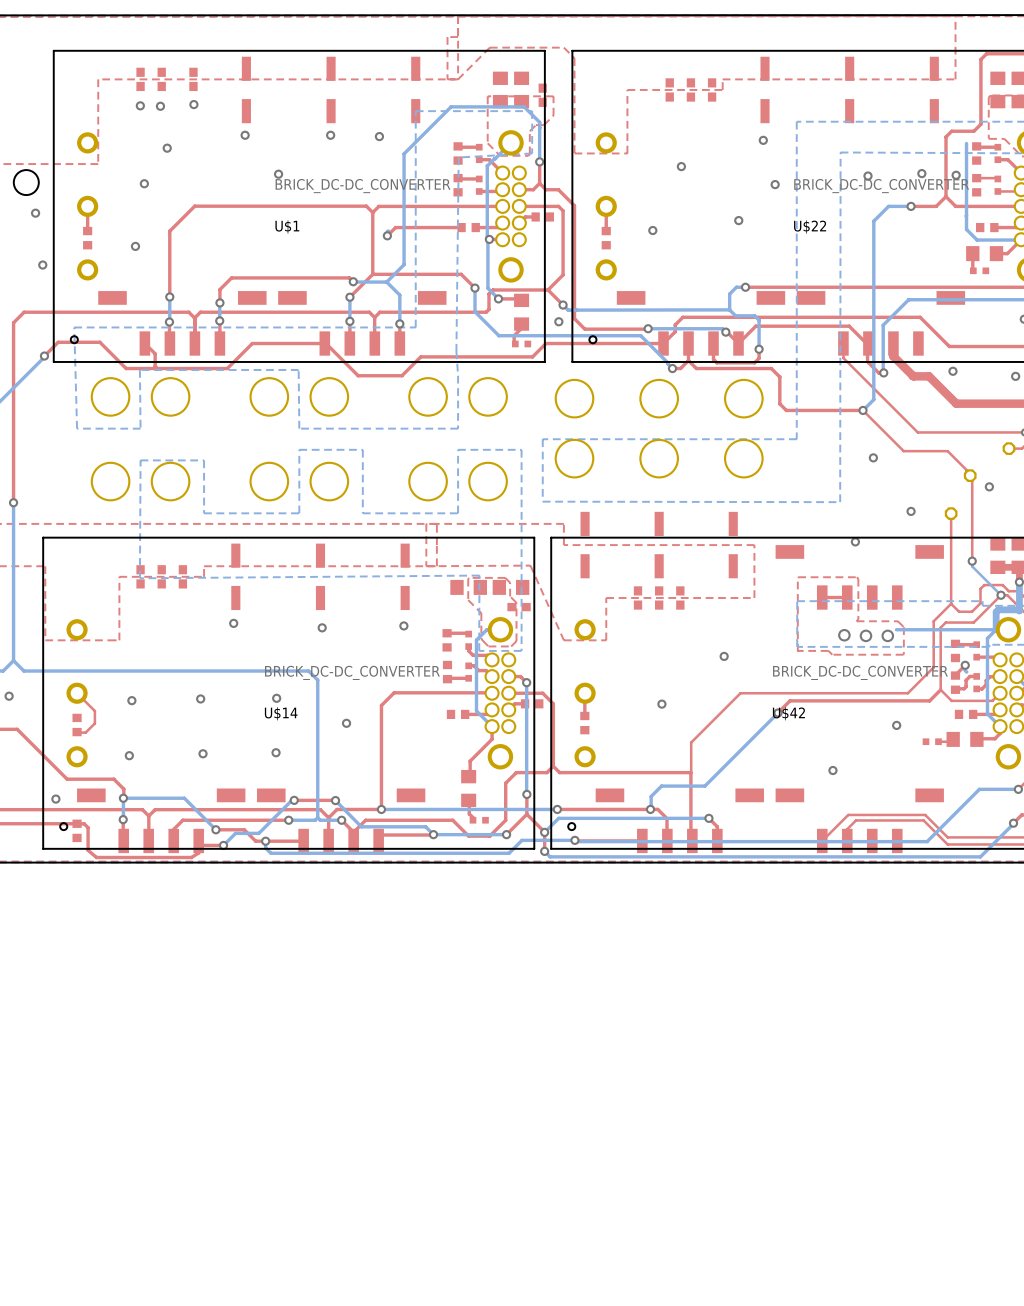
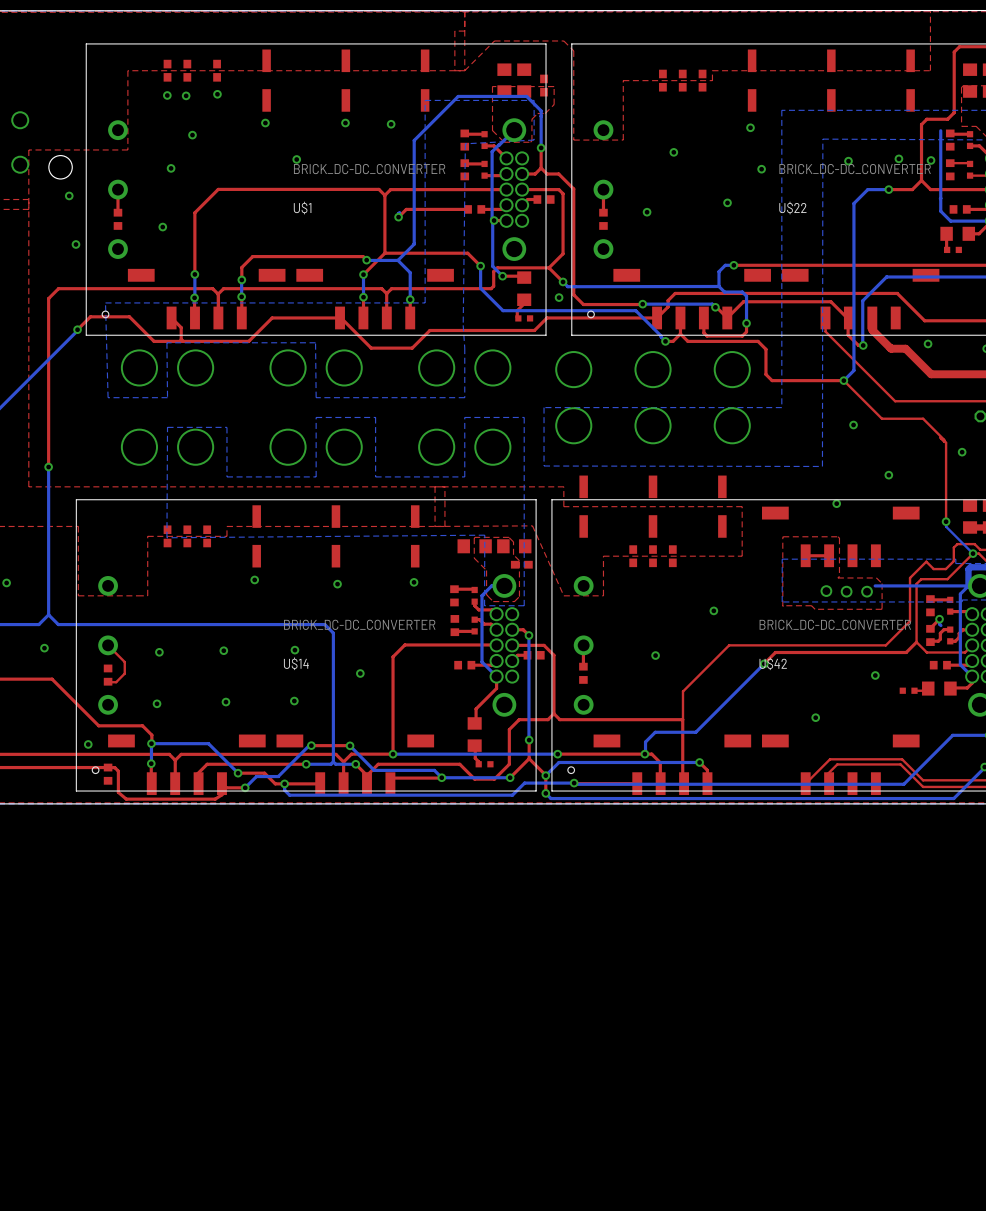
part: (970, 475) -> none
top track: (951, 513) (951, 603) -> none
part: (951, 513) -> none

